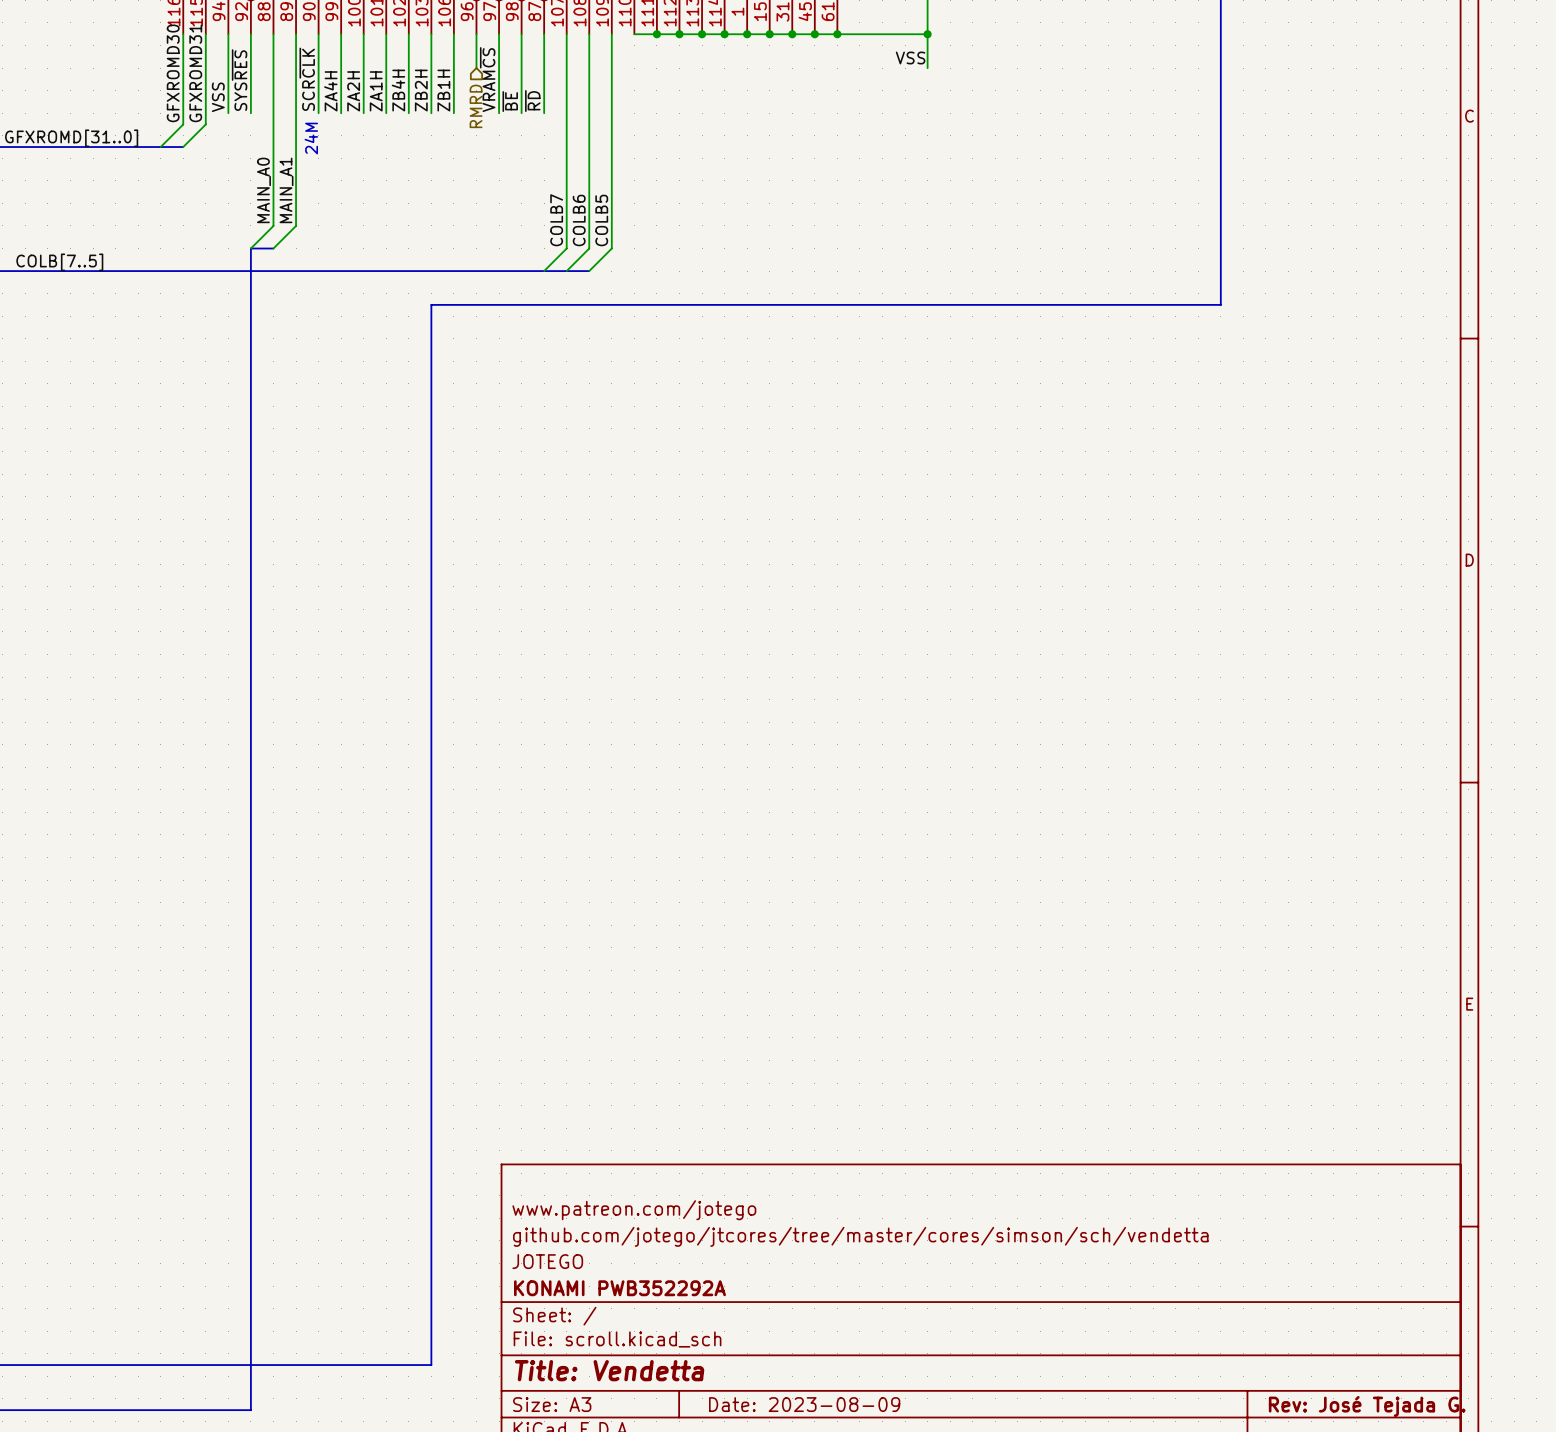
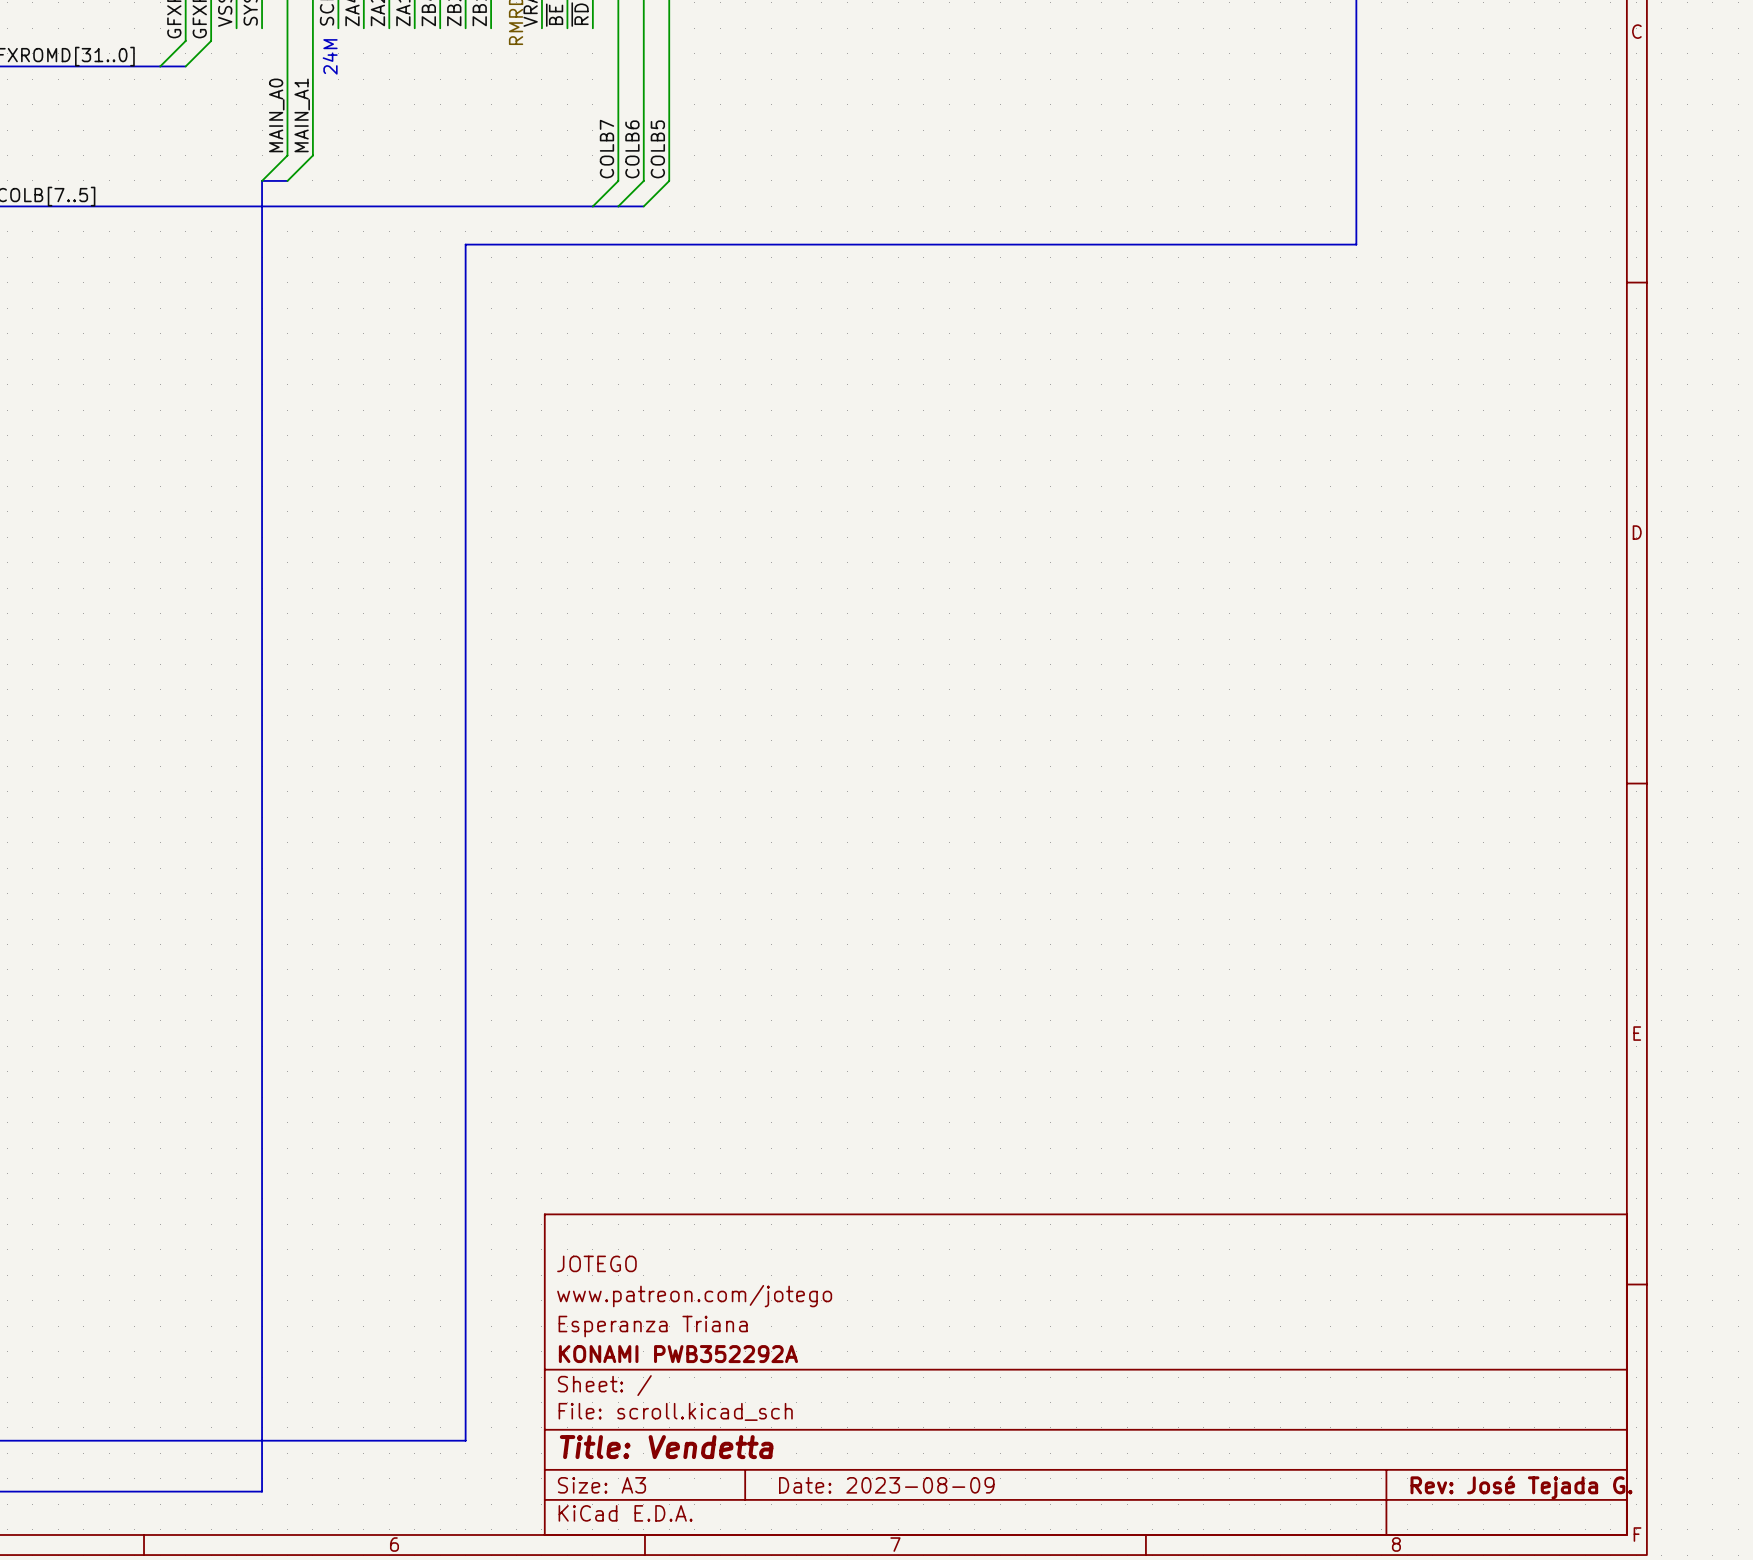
title block: www.patreon.com/jotego (634, 1210) -> JOTEGO (596, 1263)
title block: github.com/jotego/jtcores/tree/master/cores/simson/sch/vendetta (860, 1236) -> www.patreon.com/jotego (694, 1296)
title block: JOTEGO (547, 1261) -> Esperanza Triana (653, 1326)

